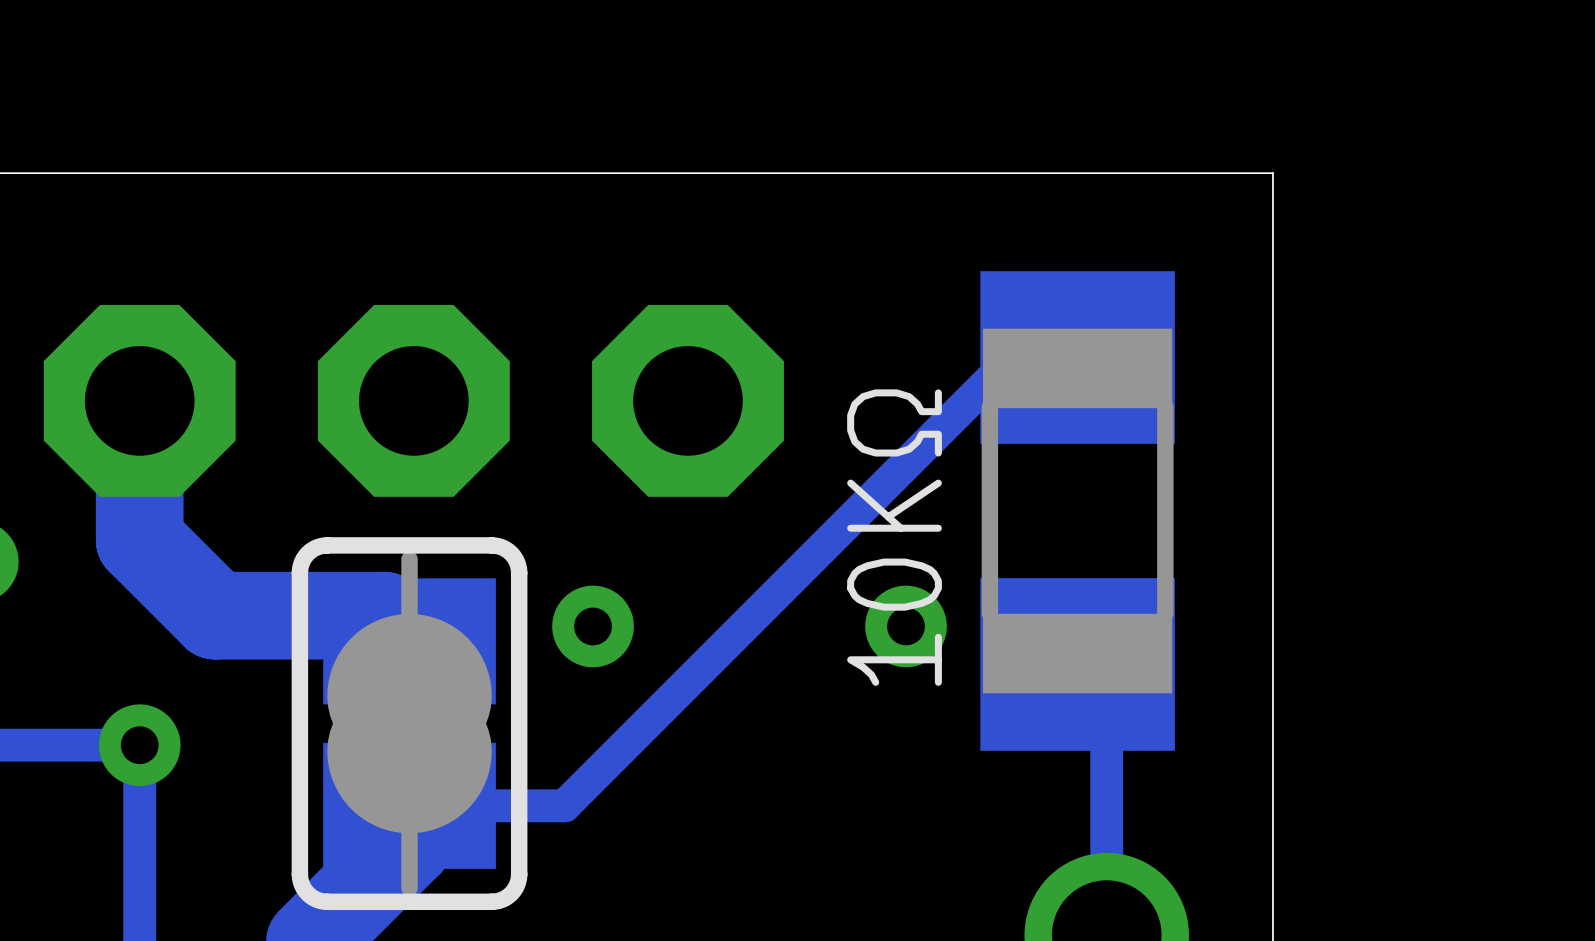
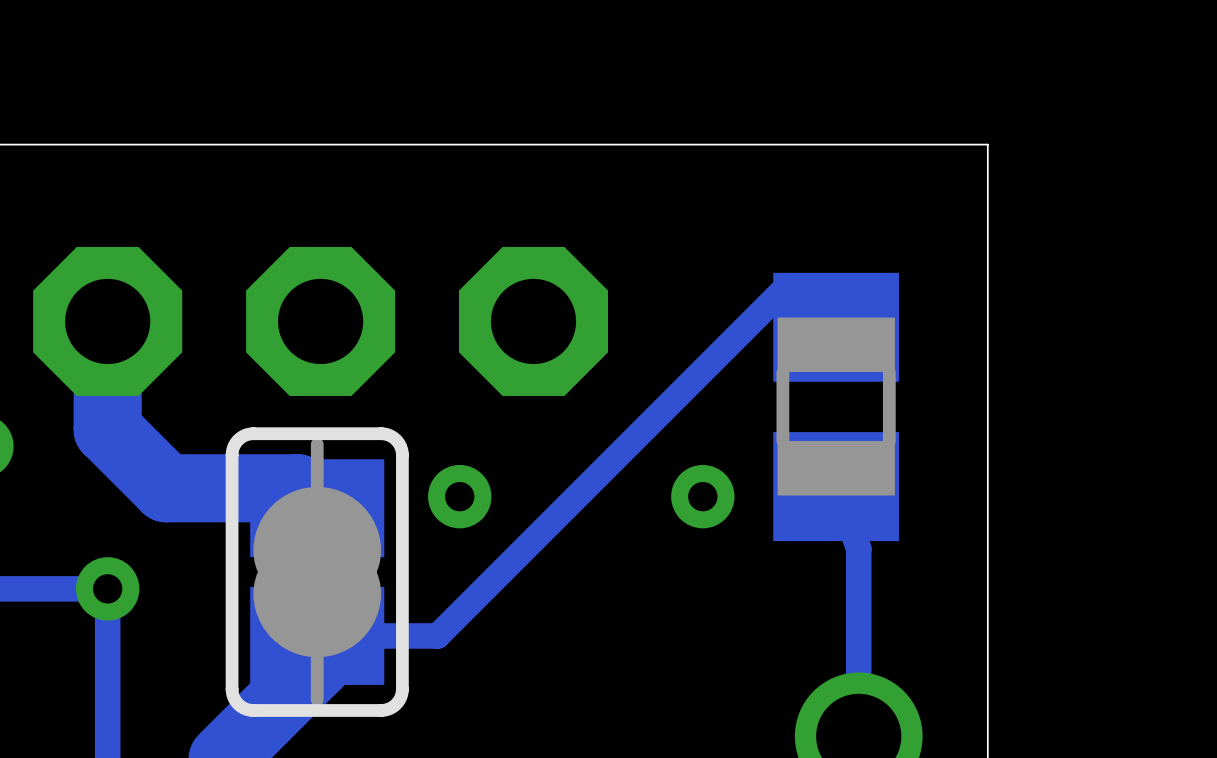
part footprint: [980, 271, 1175, 751] -> [773, 272, 899, 542]
text: 10KΩ (894, 537) -> none

